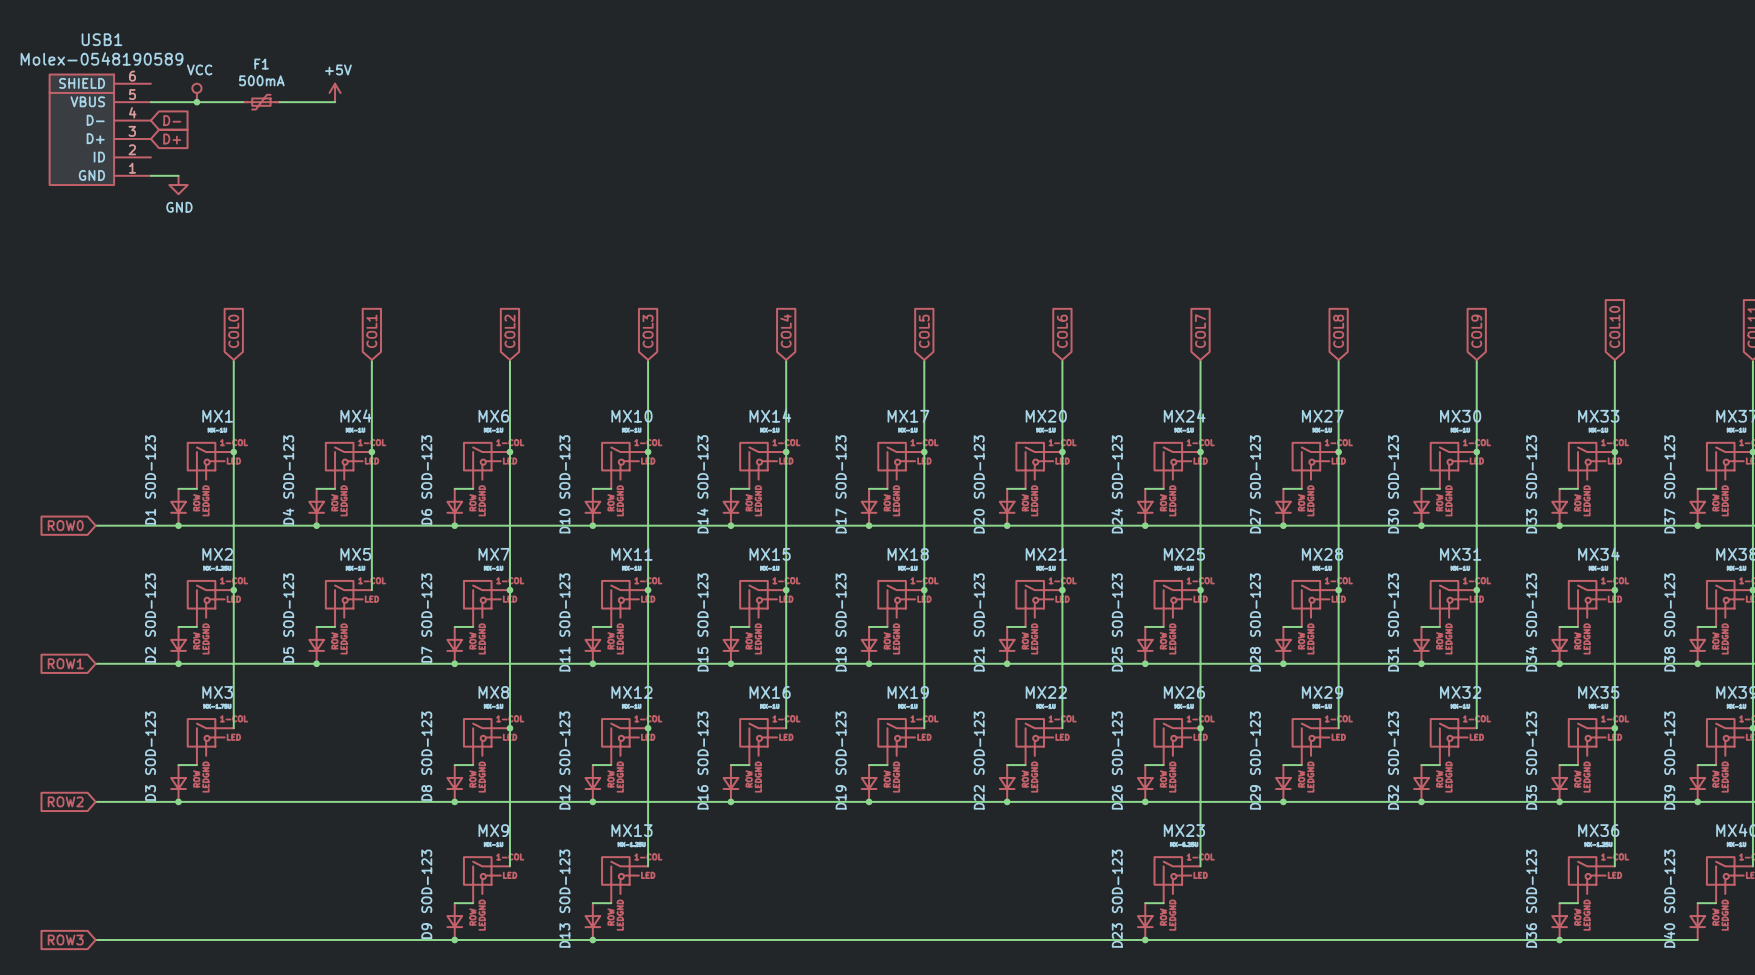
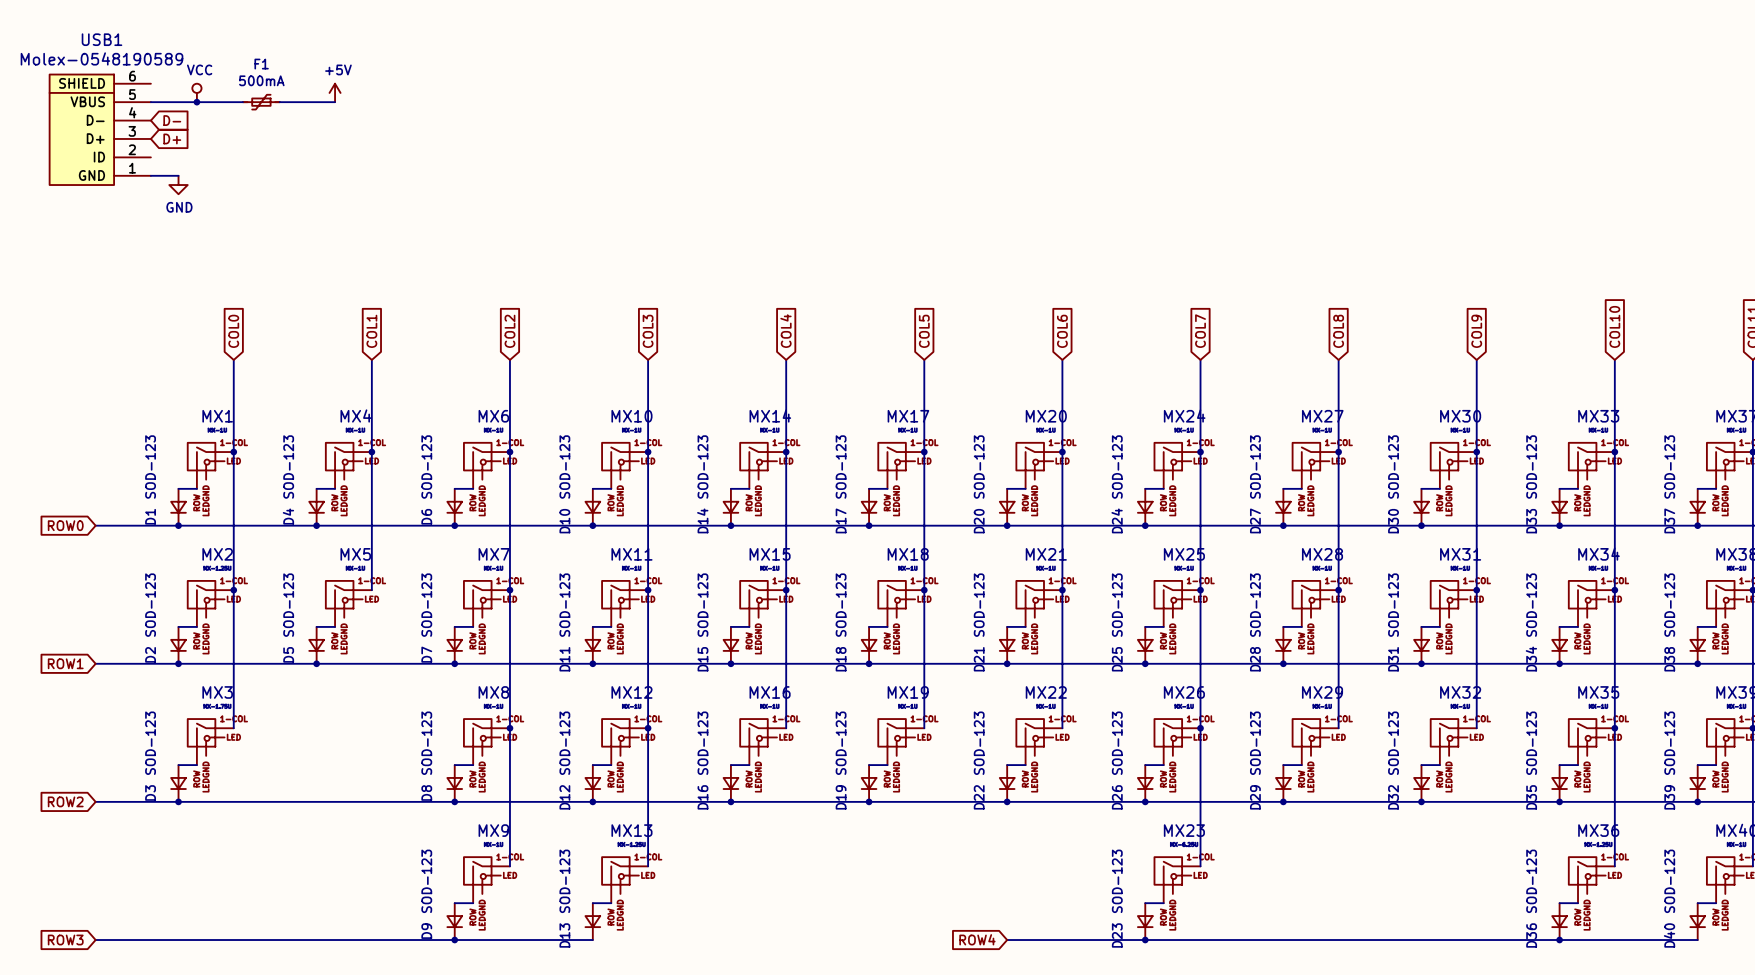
global label: none -> ROW4 (977, 939)
wire: (592, 940) (1007, 940) -> none
junction: (592, 940) -> none

